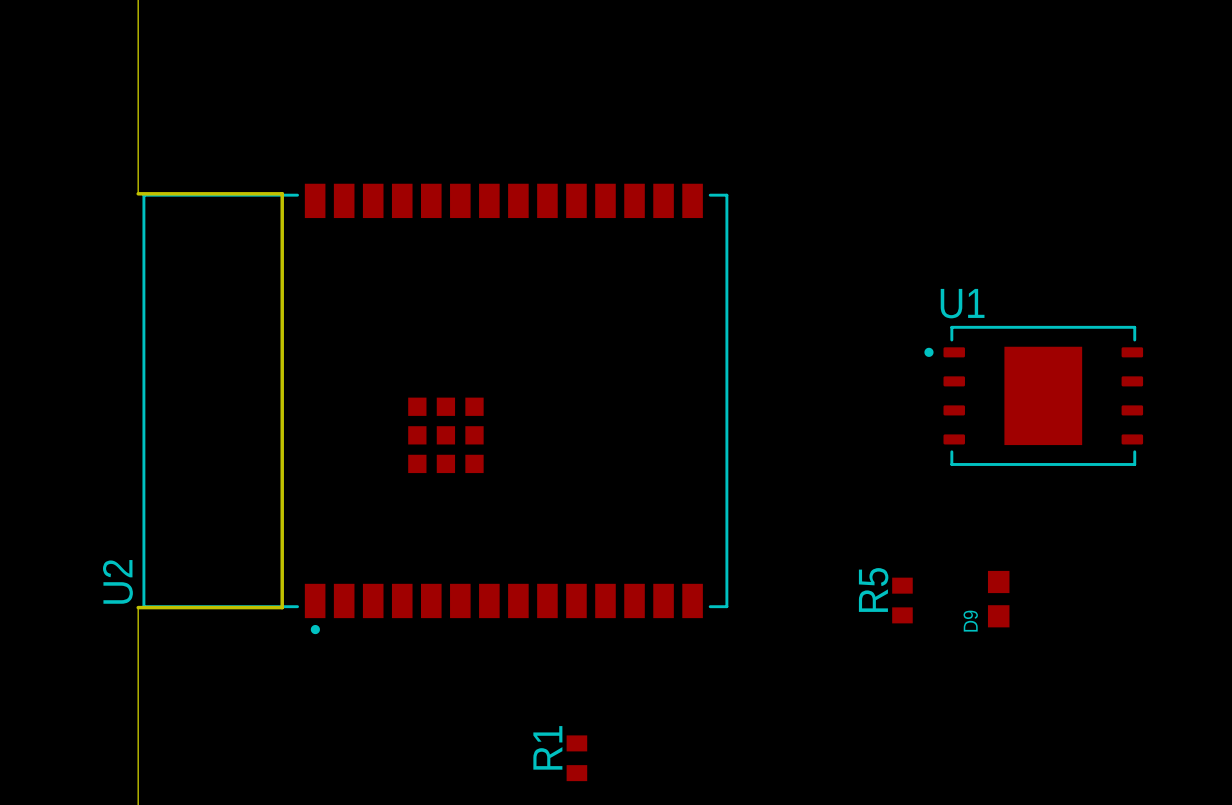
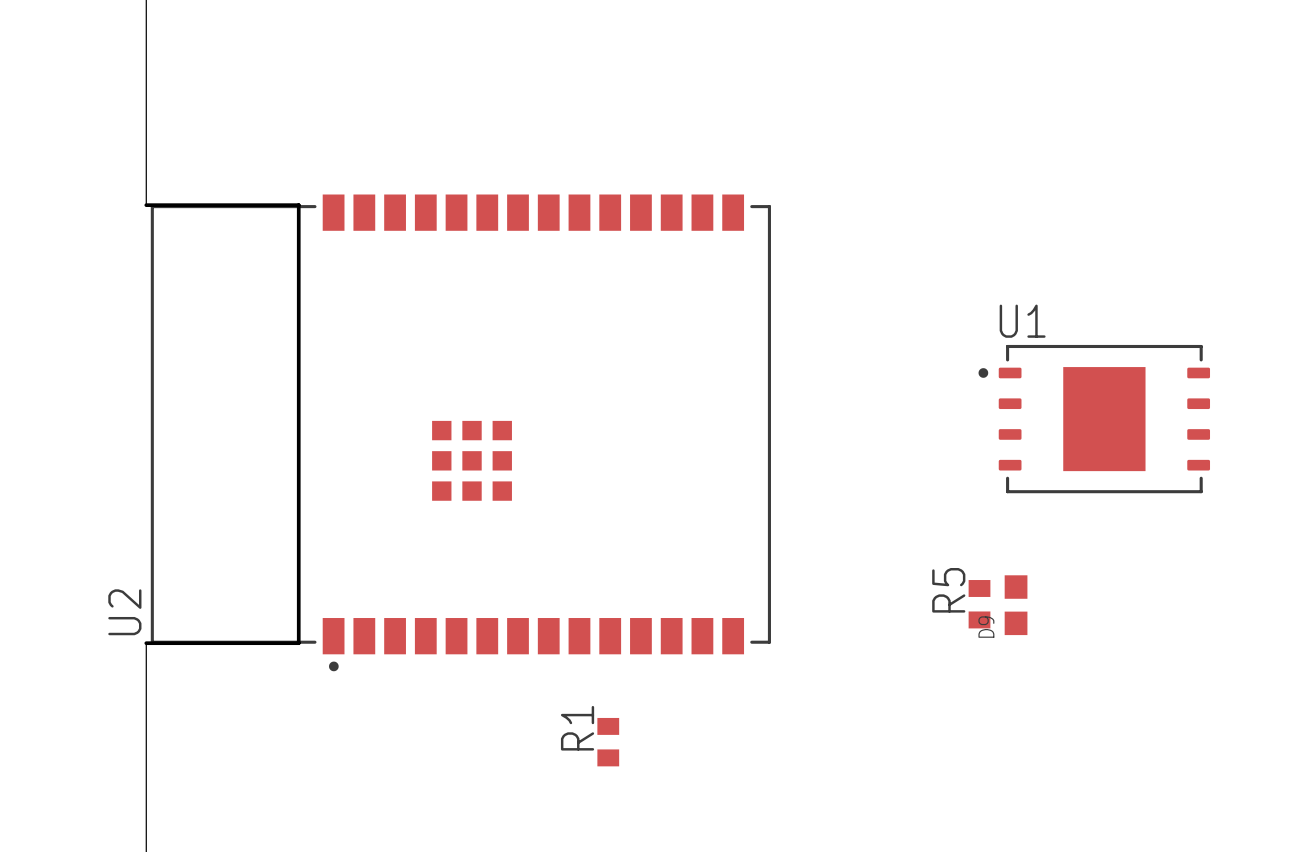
D9 position: (998, 599) -> (1016, 605)
R5 position: (902, 600) -> (979, 604)
R1 position: (576, 758) -> (608, 742)

